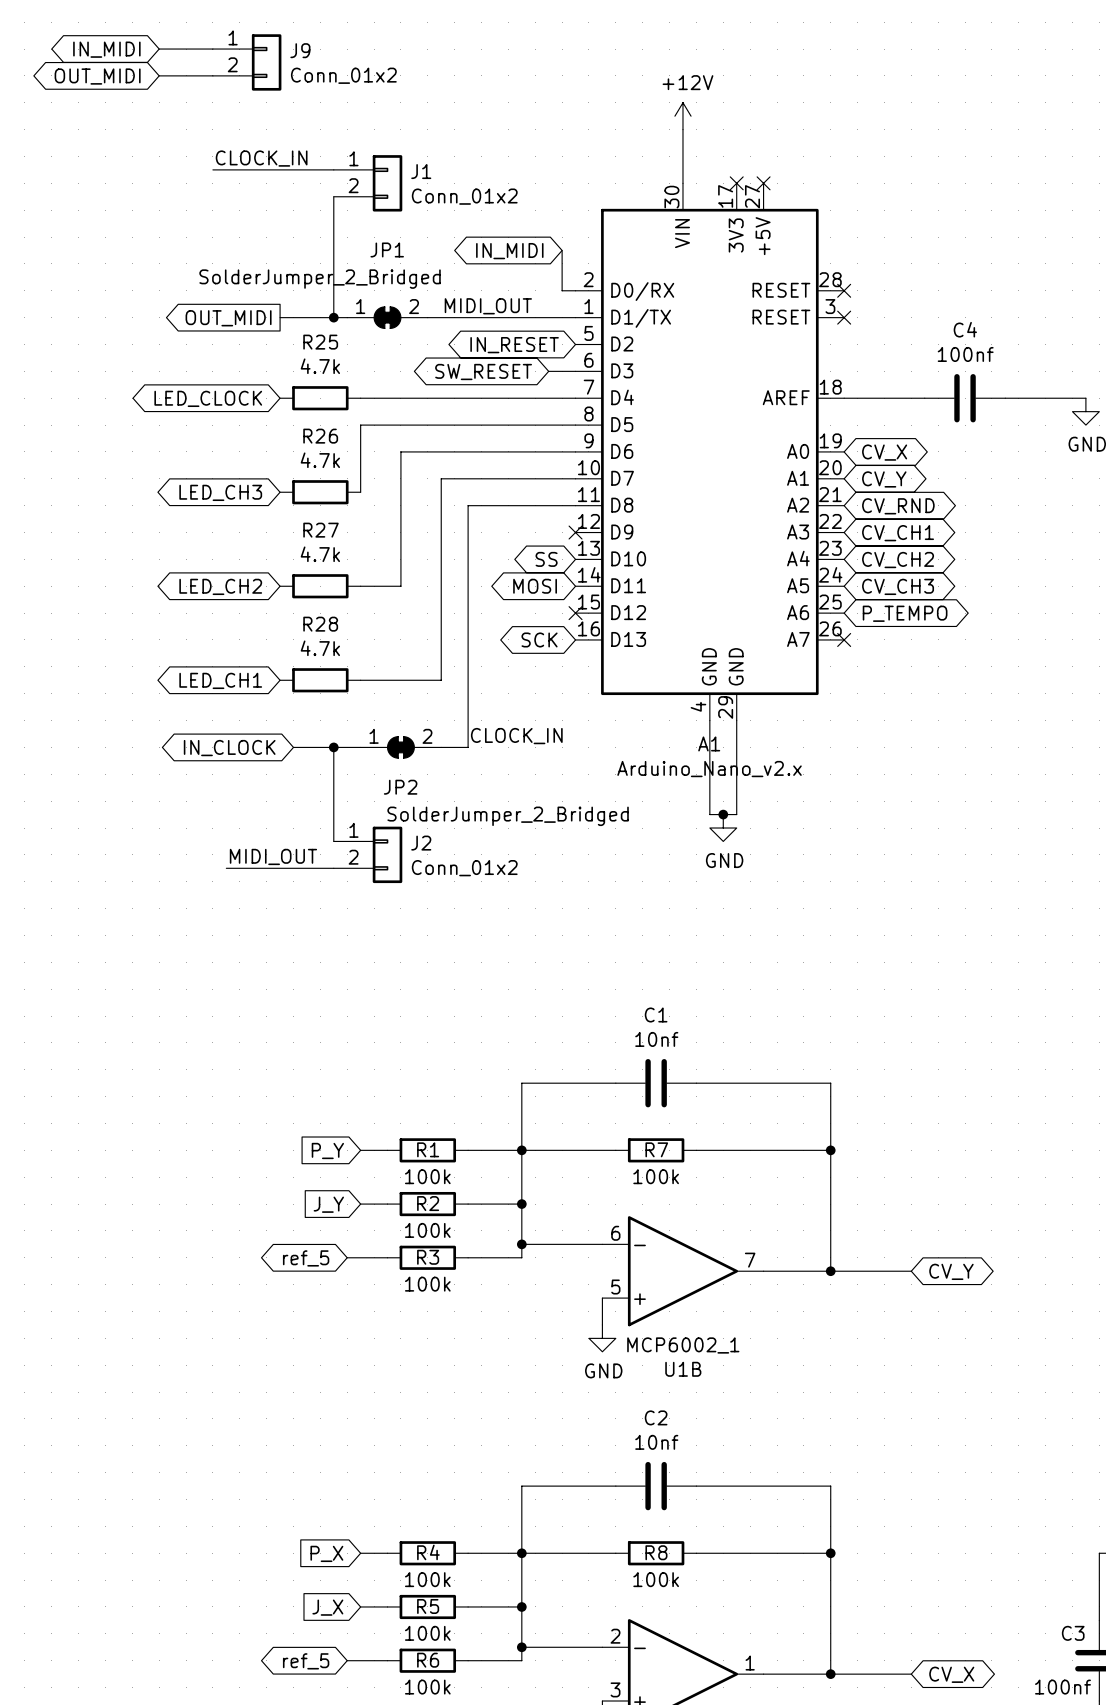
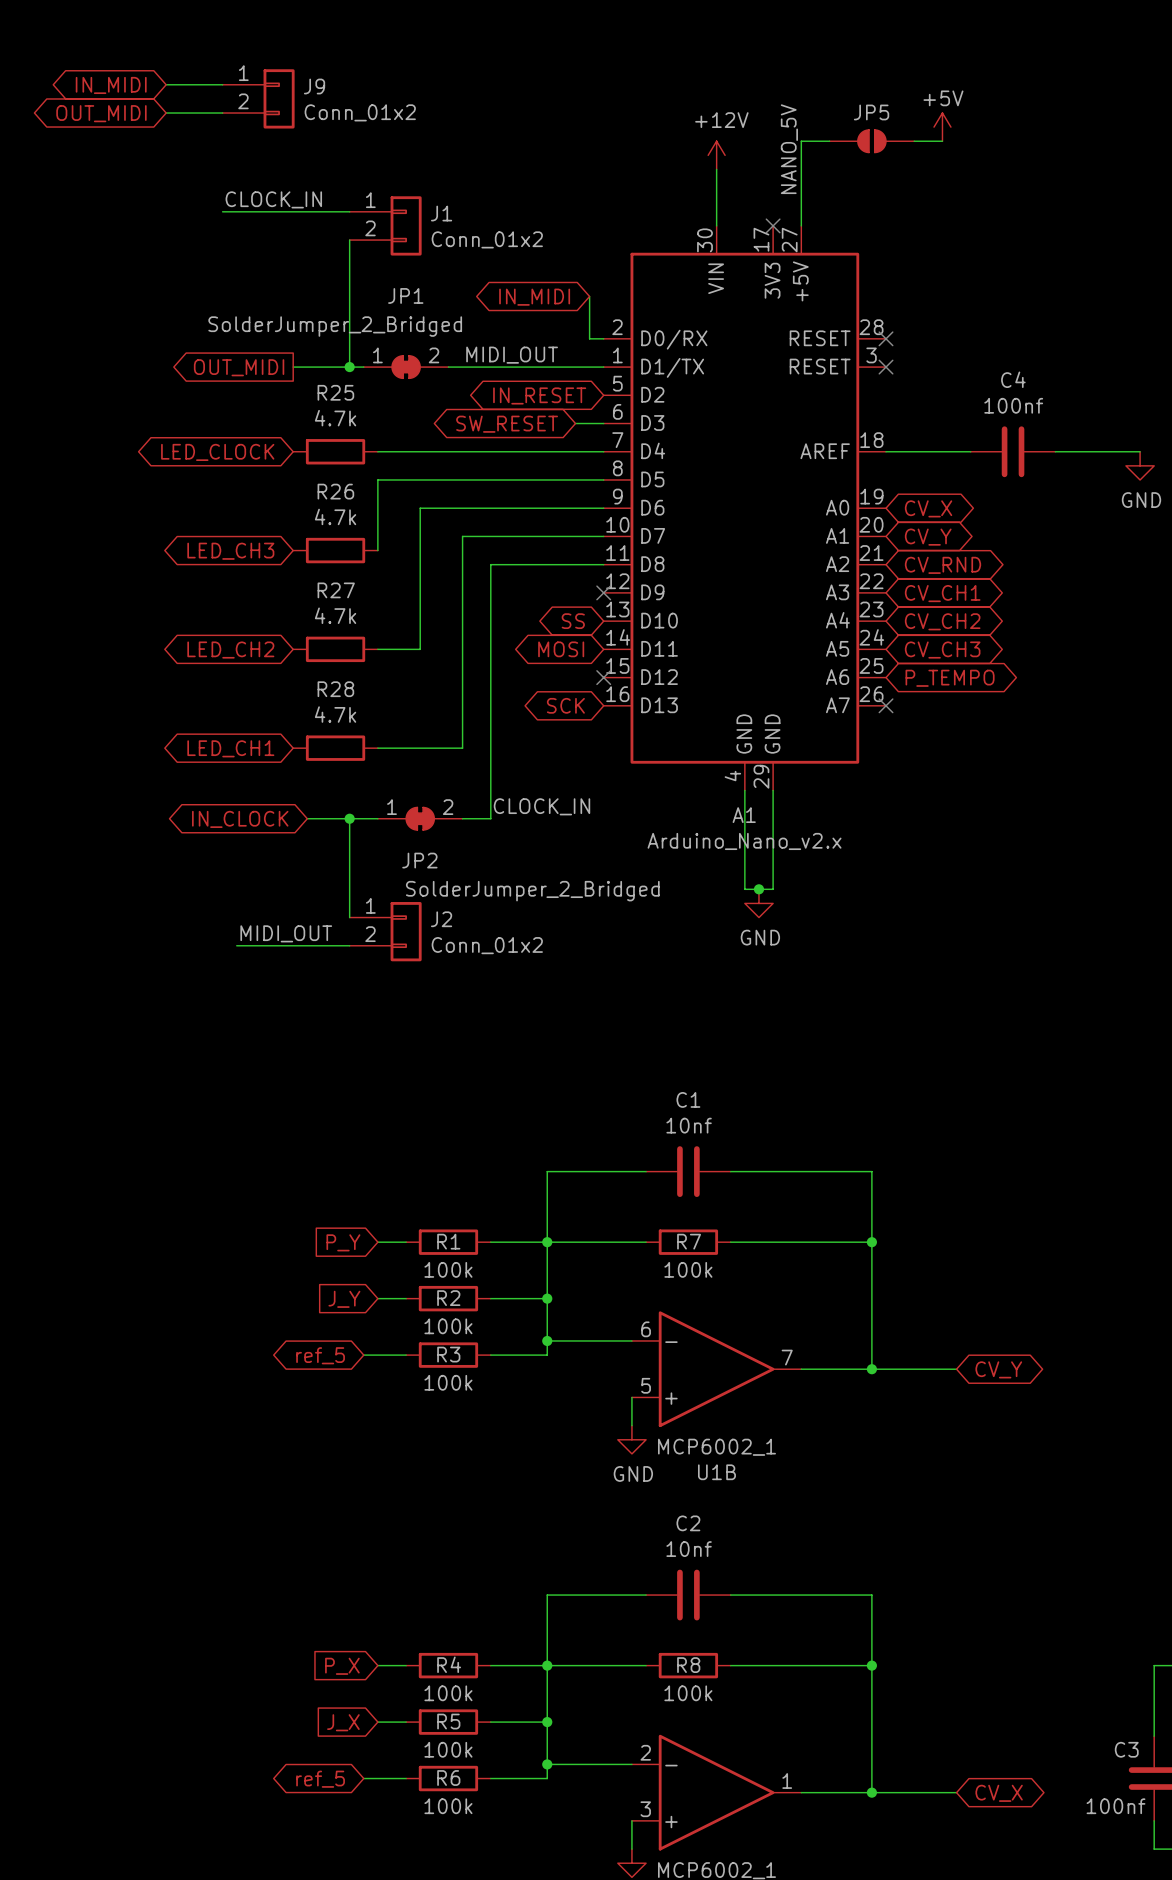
power symbol: none -> +5V (942, 127)
wire: none -> (829, 141) (801, 141) (801, 225)
JP5: none -> (871, 141)
wire: none -> (914, 141) (942, 141)
label: none -> NANO_5V (789, 149)
no-connect mark: (763, 183) -> none

